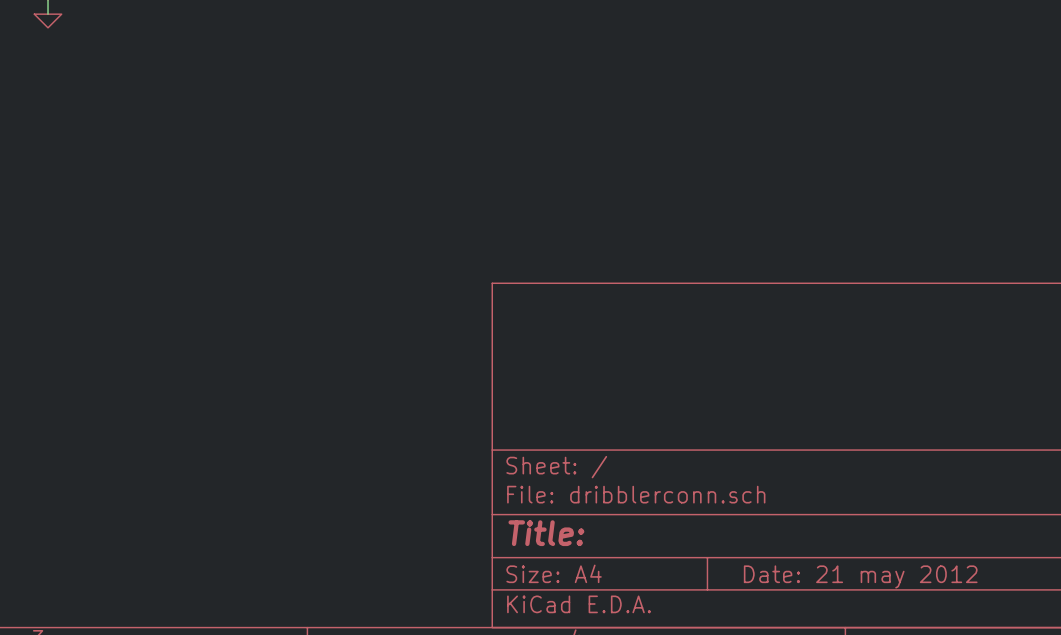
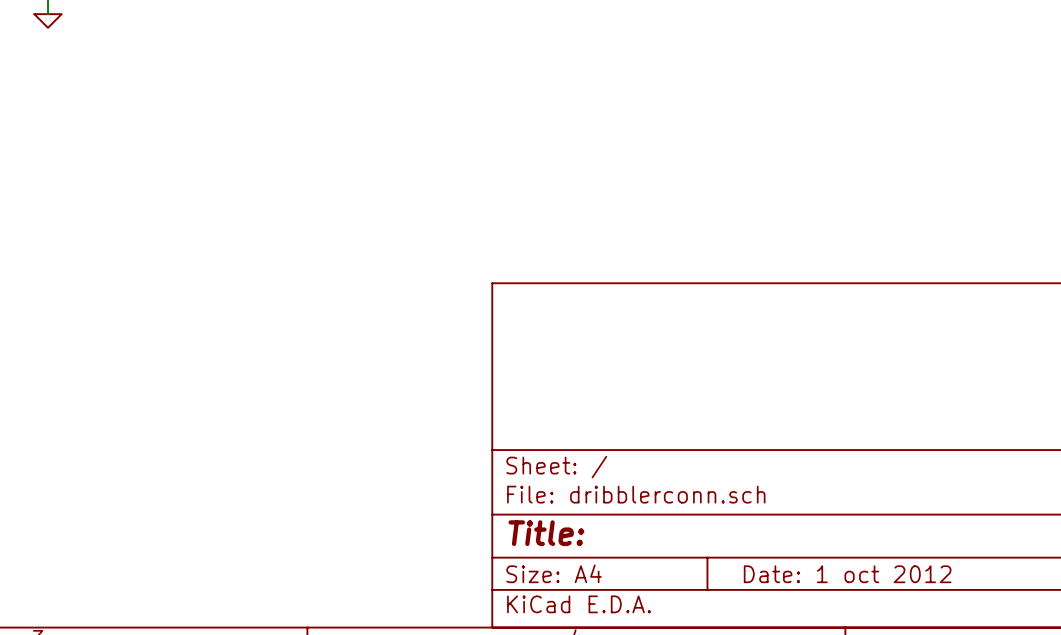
title block: Date: 21 may 2012 (860, 576) -> Date: 1 oct 2012 (847, 574)

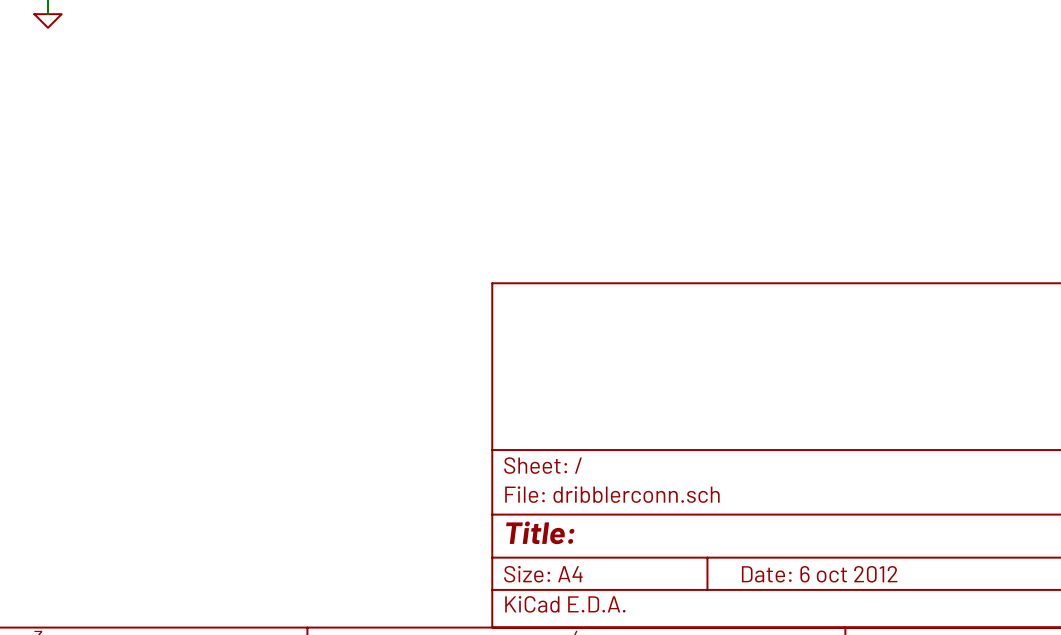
title block: Date: 1 oct 2012 (847, 574) -> Date: 6 oct 2012 (819, 574)

